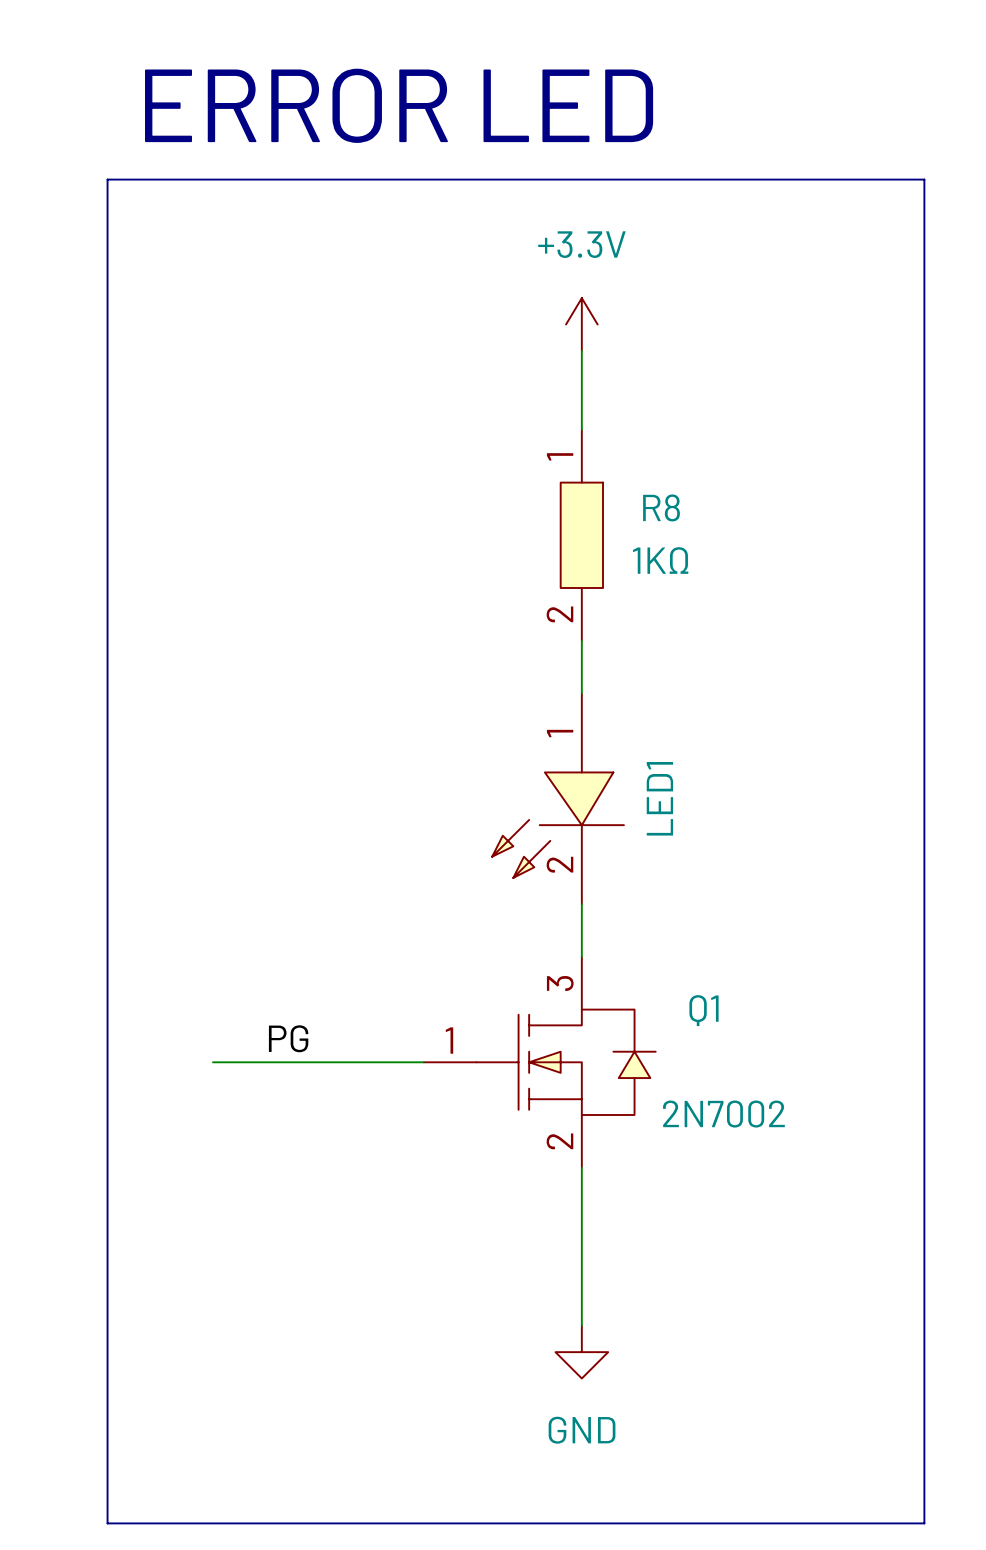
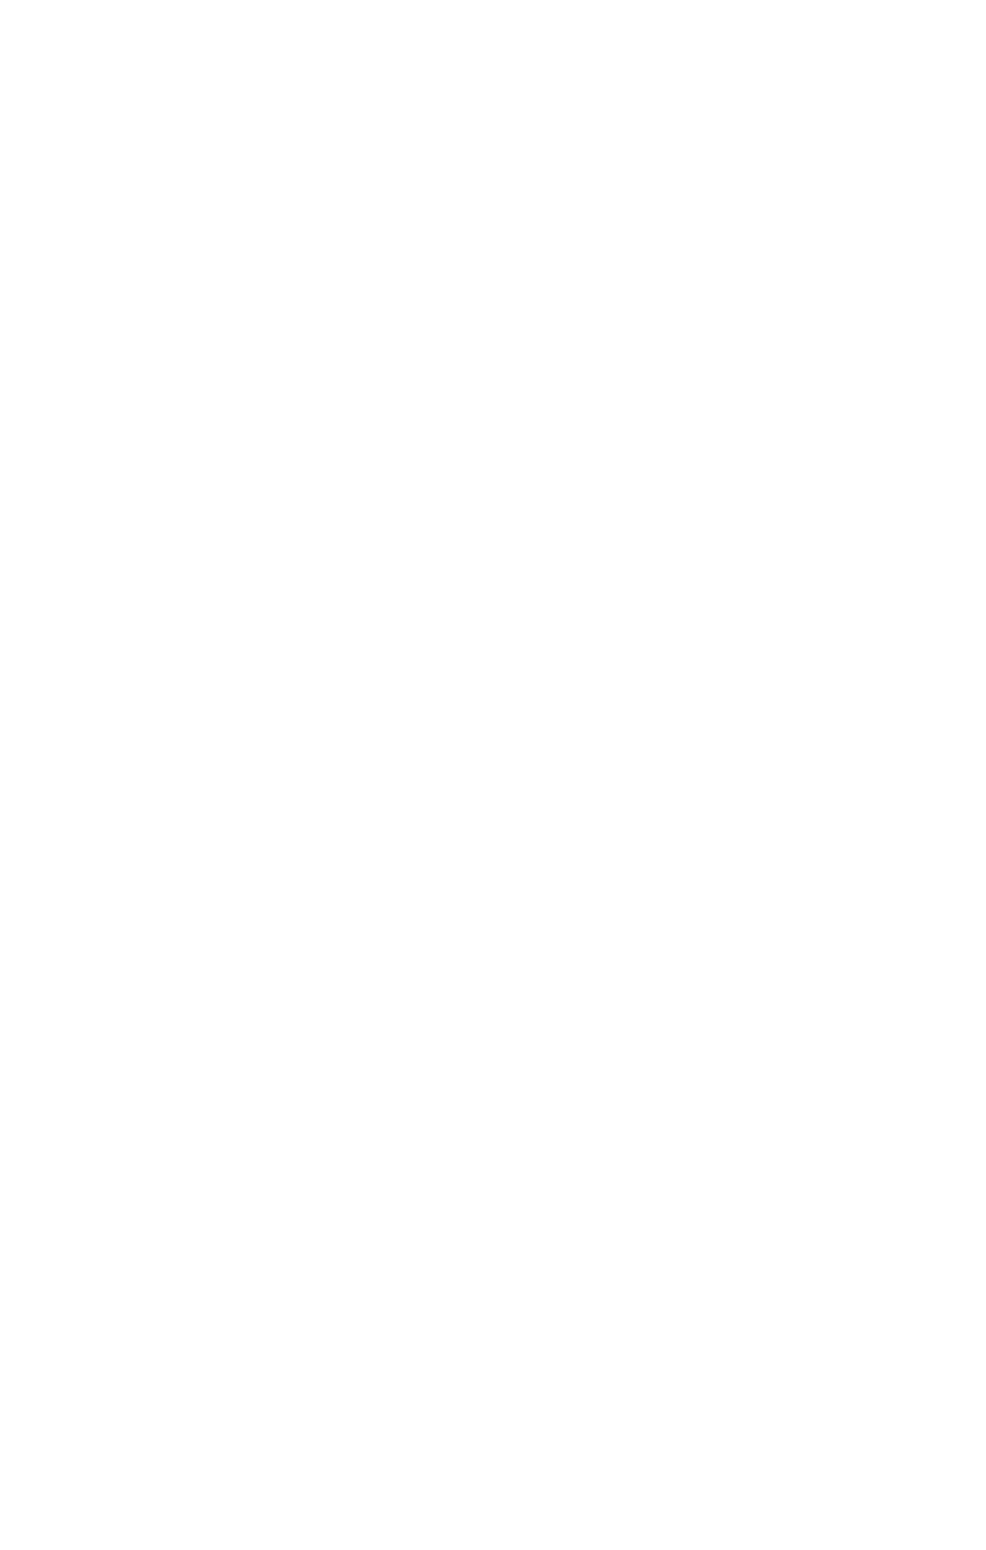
text: ERROR LED (399, 105) -> none
line: (107, 179) (924, 179) (924, 1523) (107, 1523) (107, 179) -> none
power symbol: +3.3V (581, 324) -> none
wire: (581, 350) (581, 429) -> none
R8: 1KΩ (581, 535) -> none
wire: (581, 640) (581, 693) -> none
LED1: (558, 798) -> none
wire: (581, 904) (581, 956) -> none
label: PG (288, 1038) -> none
wire: (212, 1062) (423, 1062) -> none
Q1: 2N7002 (539, 1062) -> none
wire: (581, 1167) (581, 1325) -> none
power symbol: GND (581, 1352) -> none

